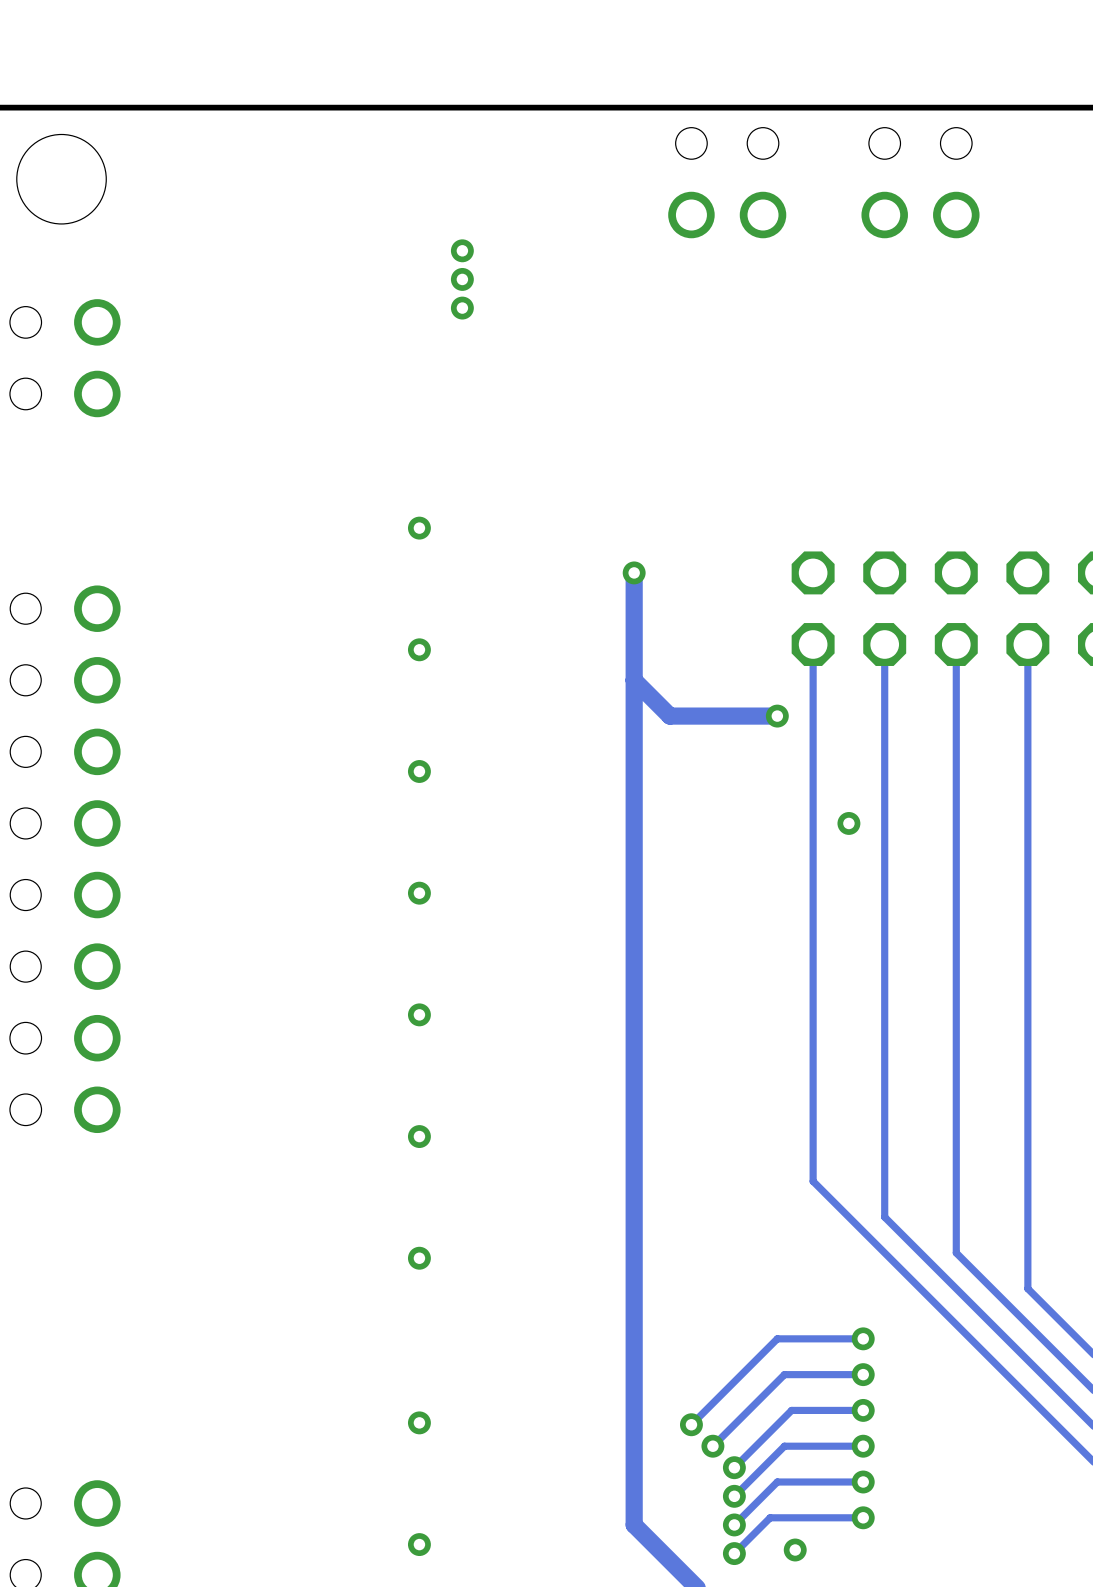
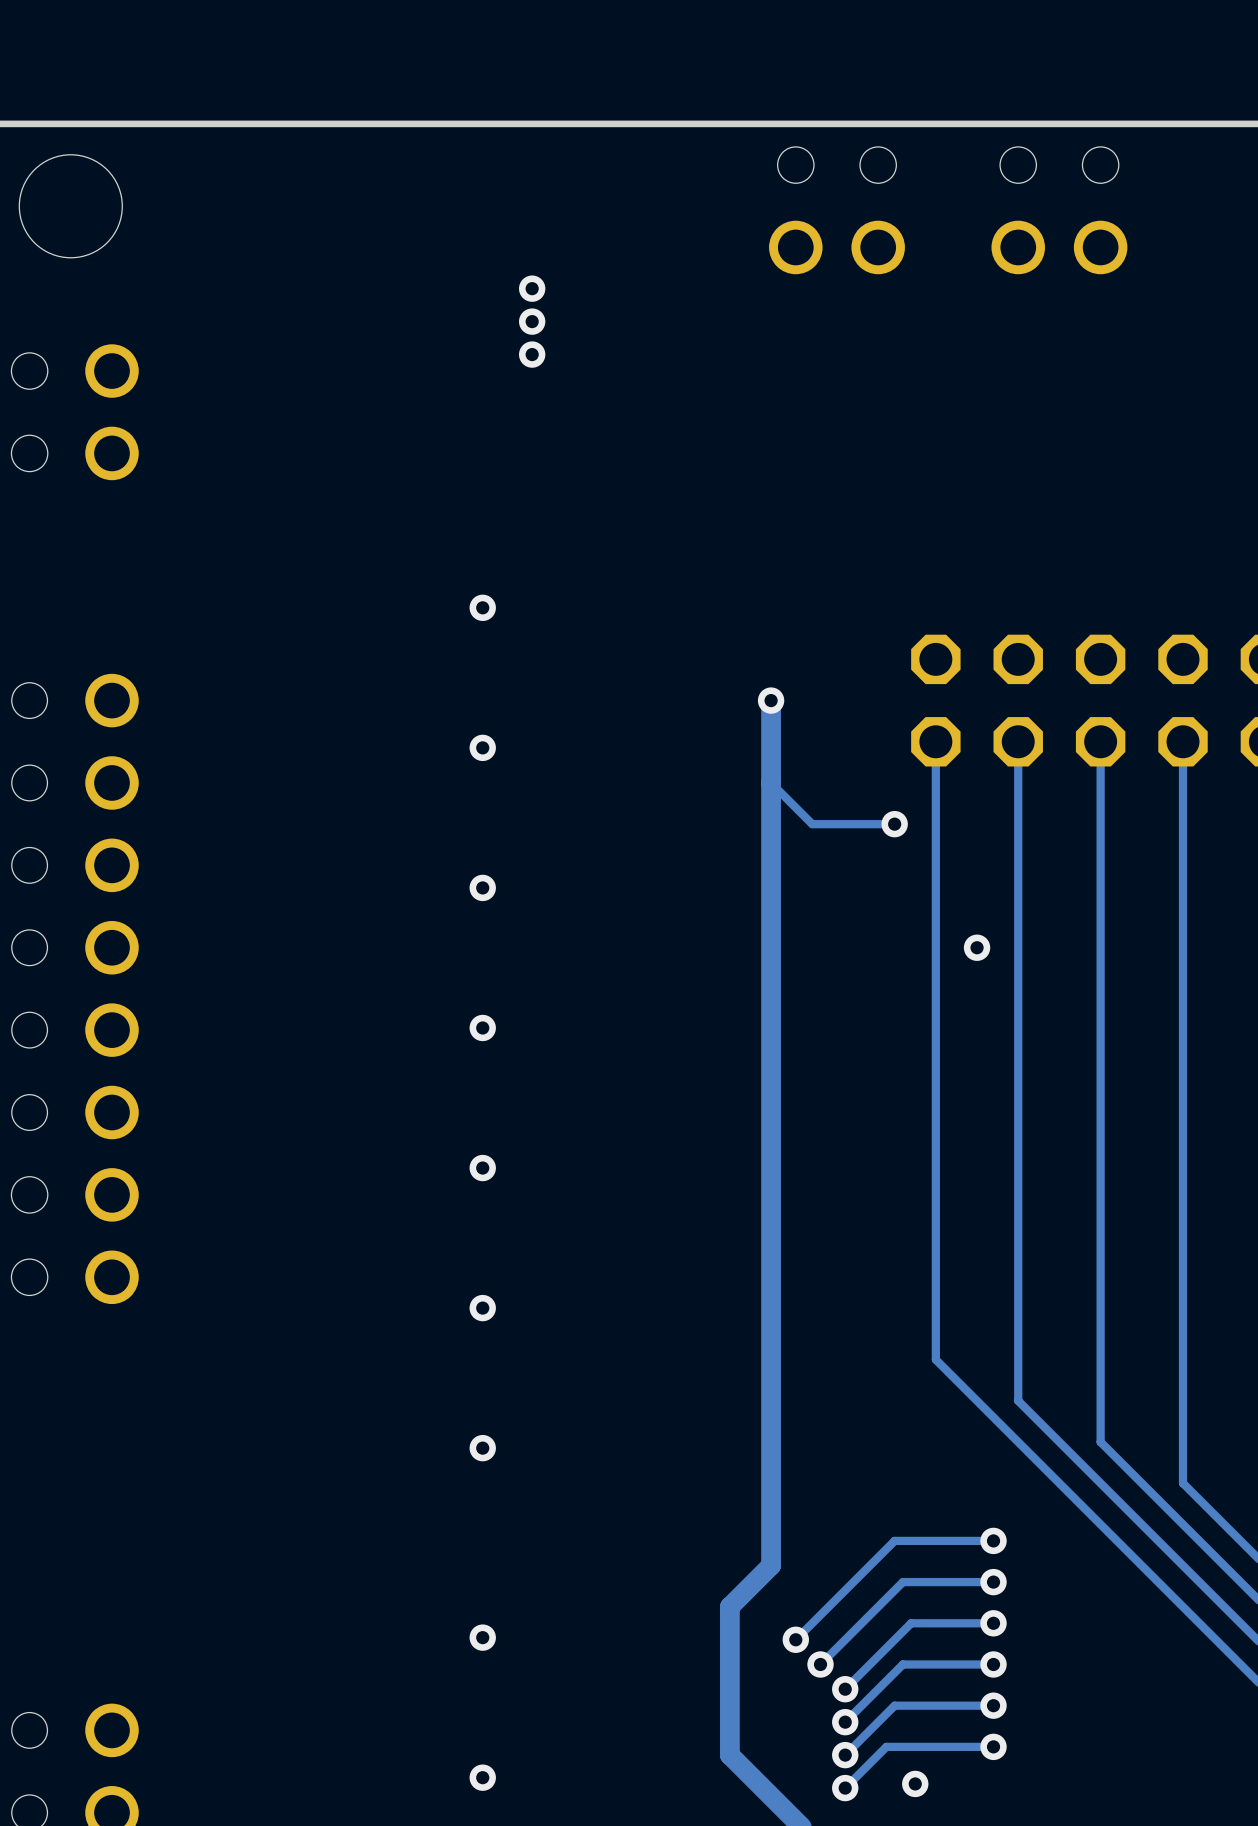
track: (634, 572) (634, 1396) -> (771, 700) (771, 1565) (729, 1606)
via position: (634, 572) -> (771, 700)
track: (634, 680) (669, 716) (705, 716) -> (771, 782) (812, 824)
track width: thick (777, 716) (705, 716) -> thin (894, 824) (812, 824)

